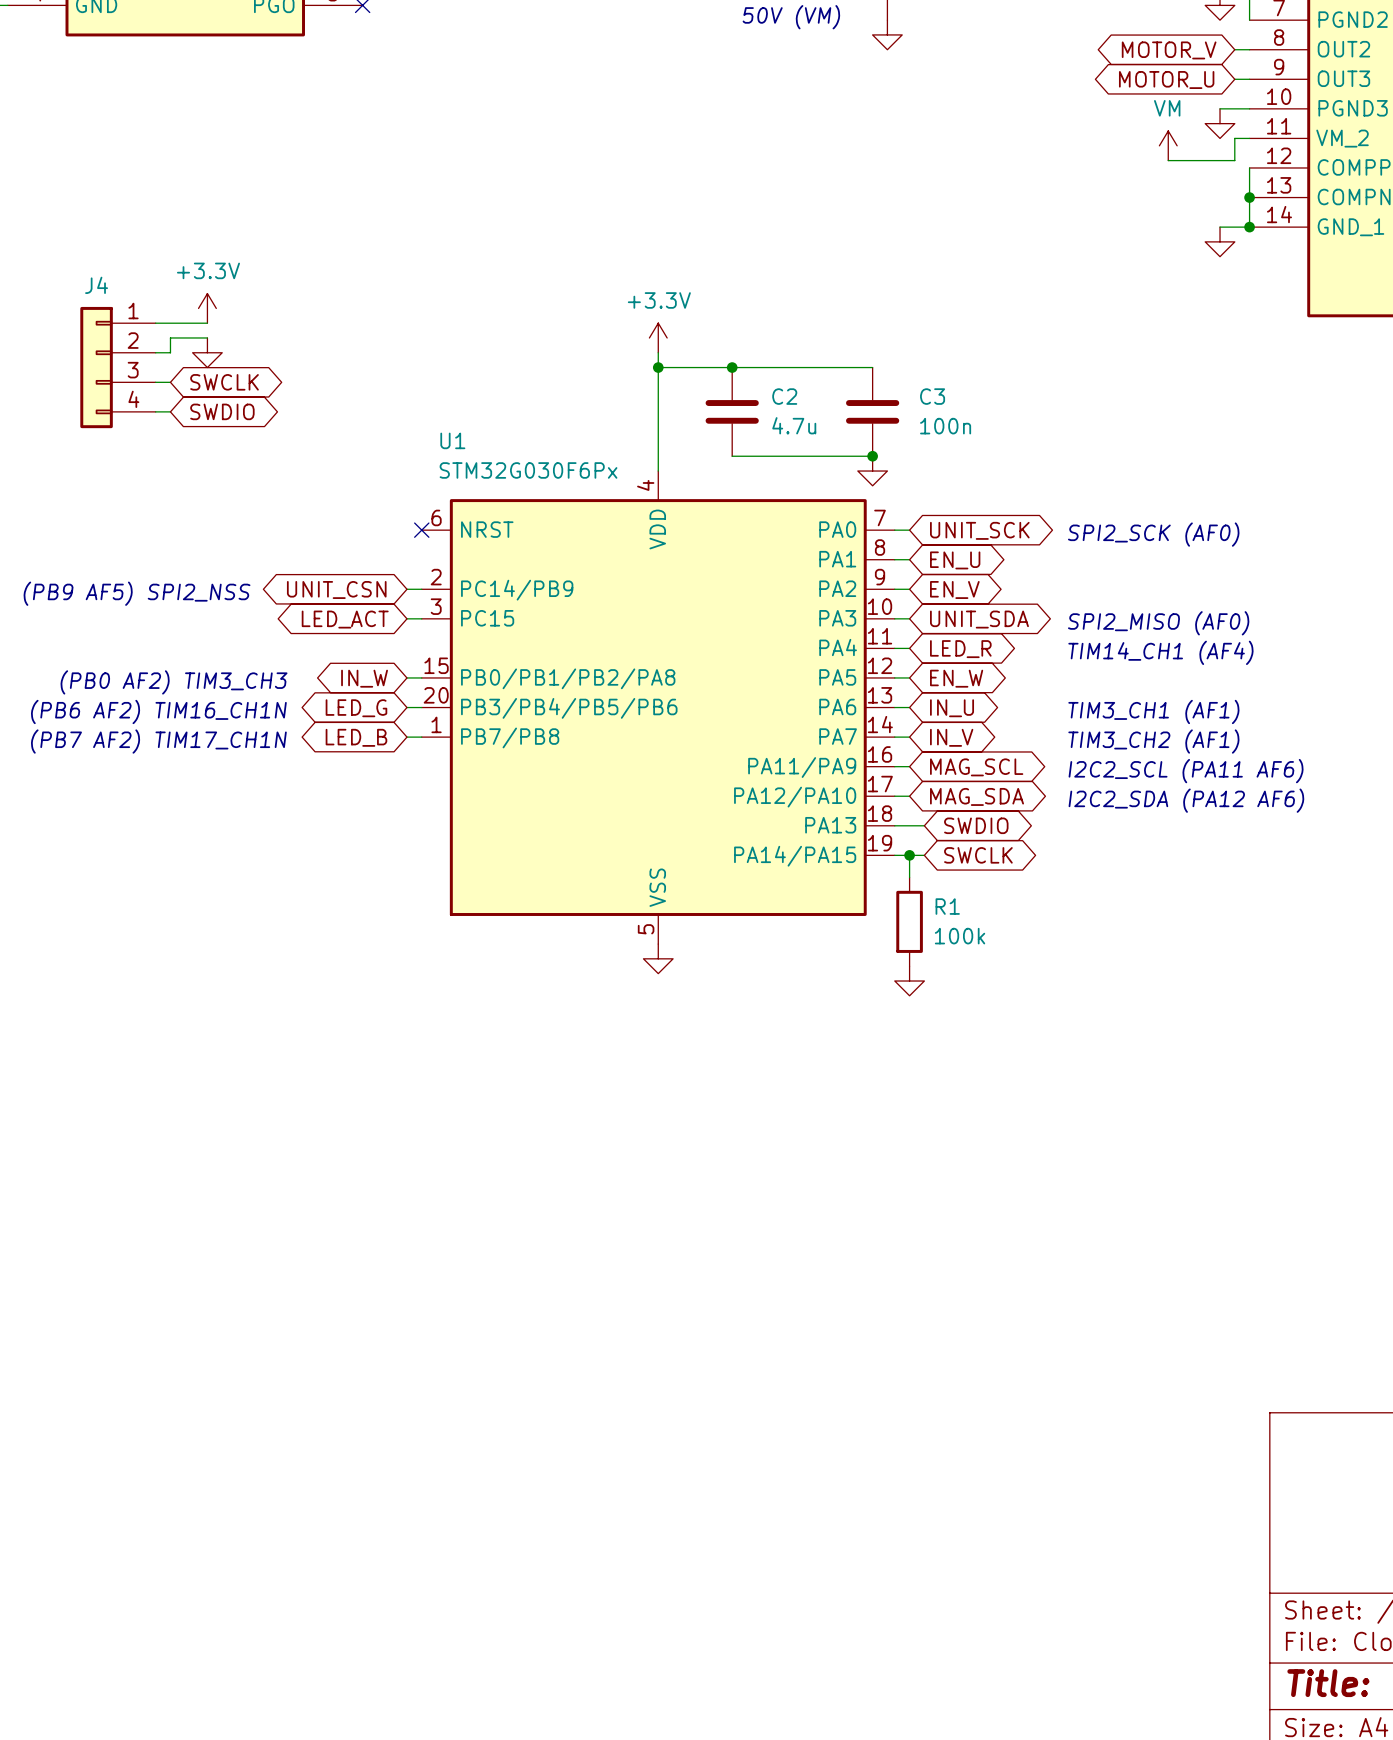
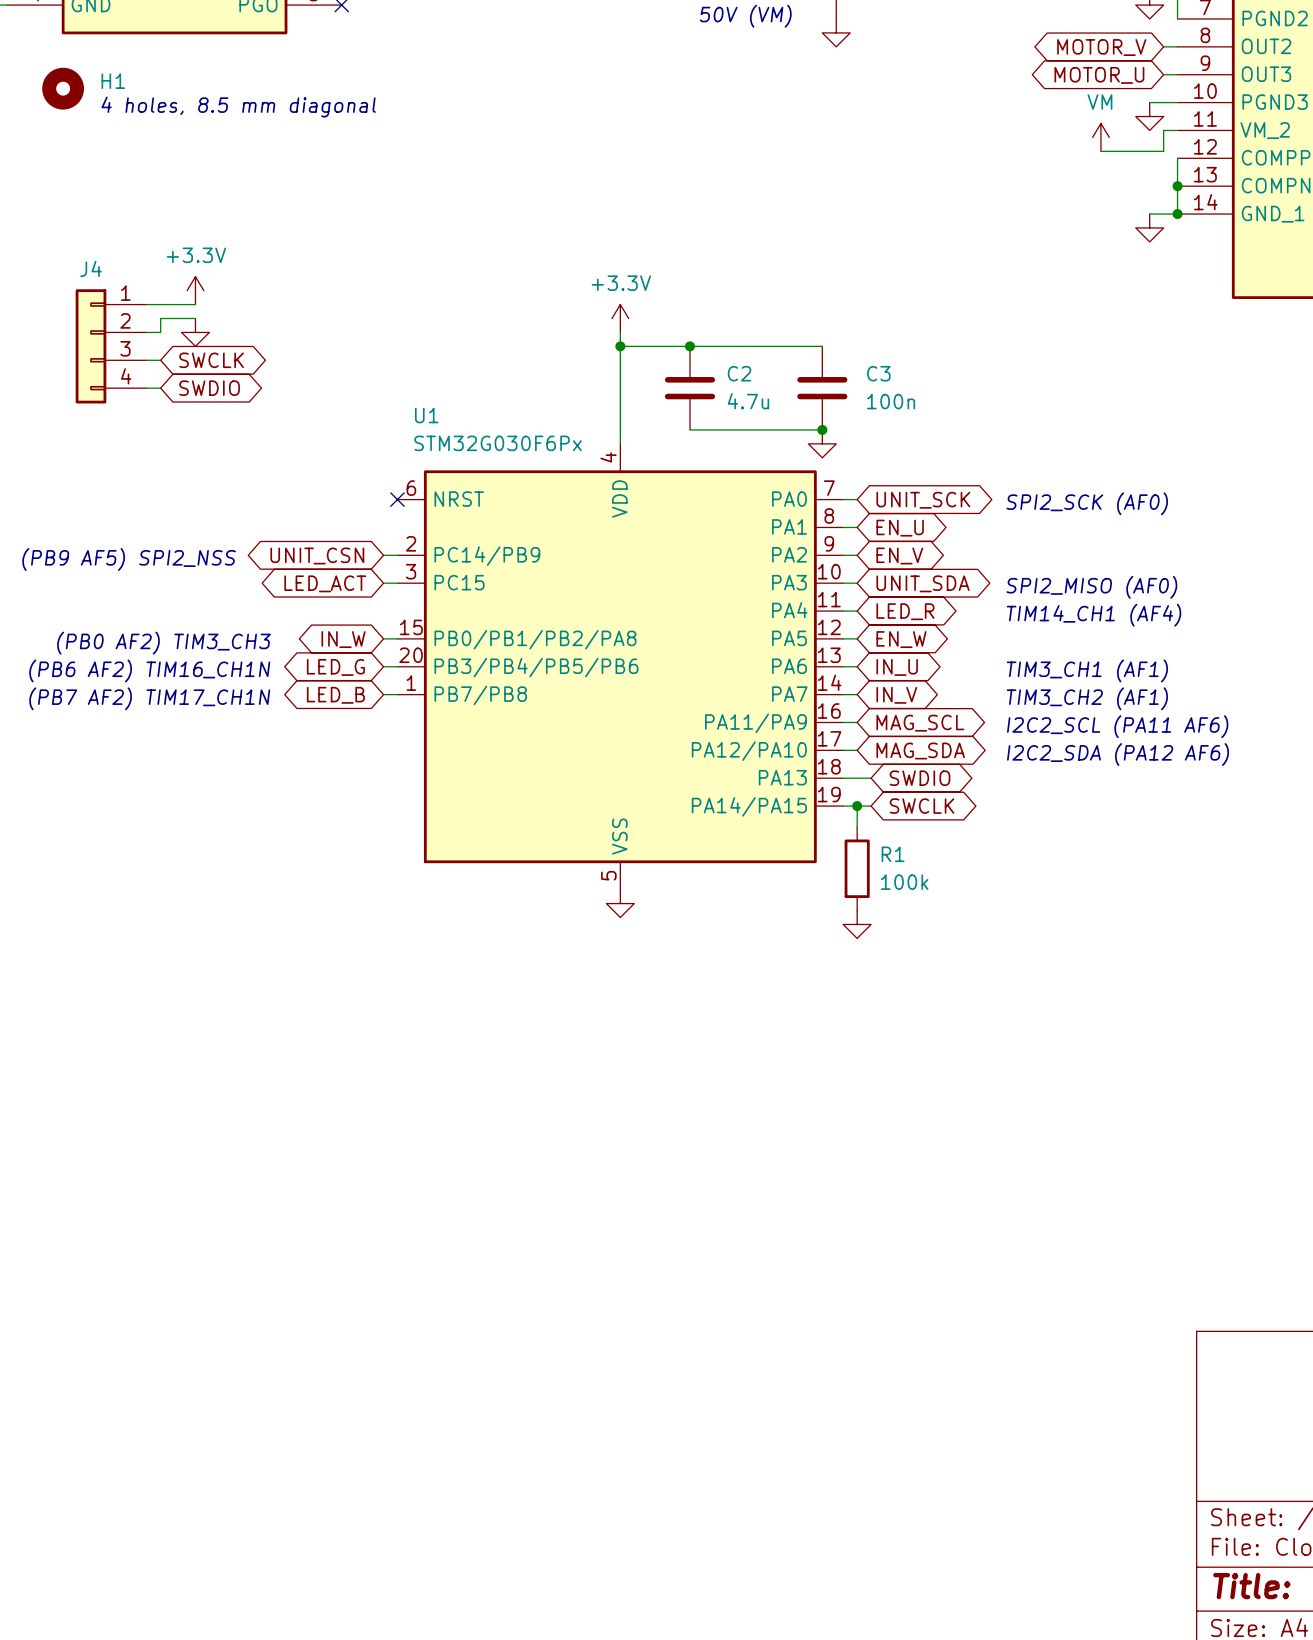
H1: none -> (63, 88)
text: none -> 4 holes, 8.5 mm diagonal (238, 107)

